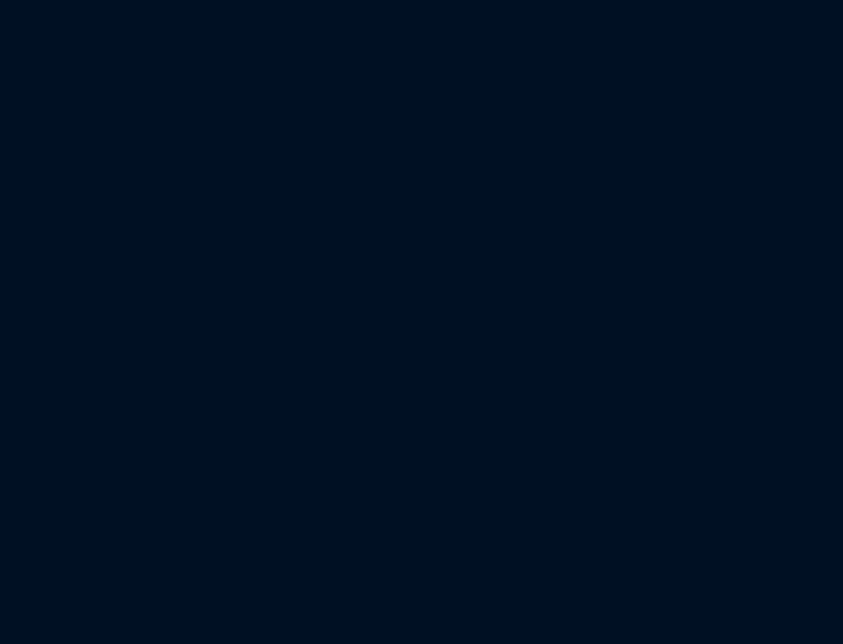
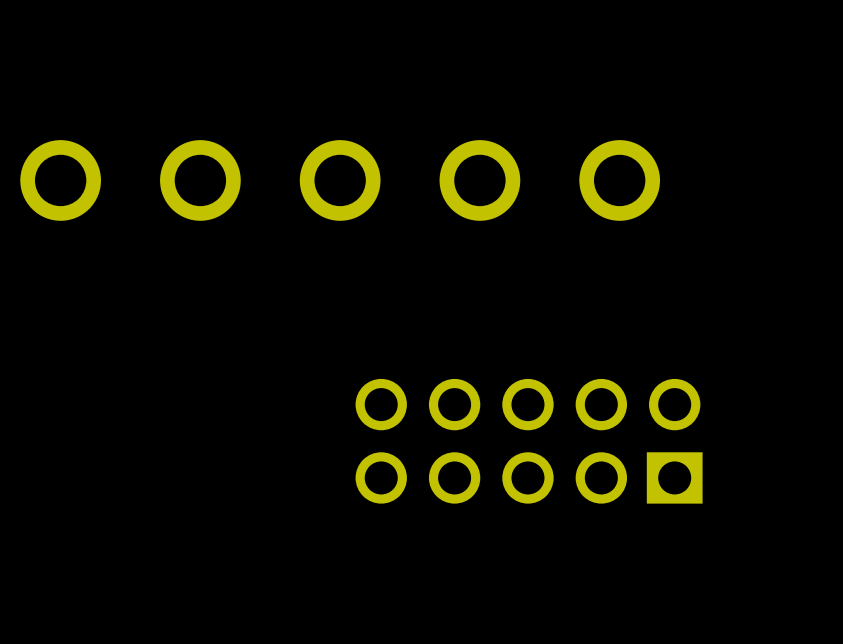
part: none -> (340, 180)
part: none -> (529, 441)

